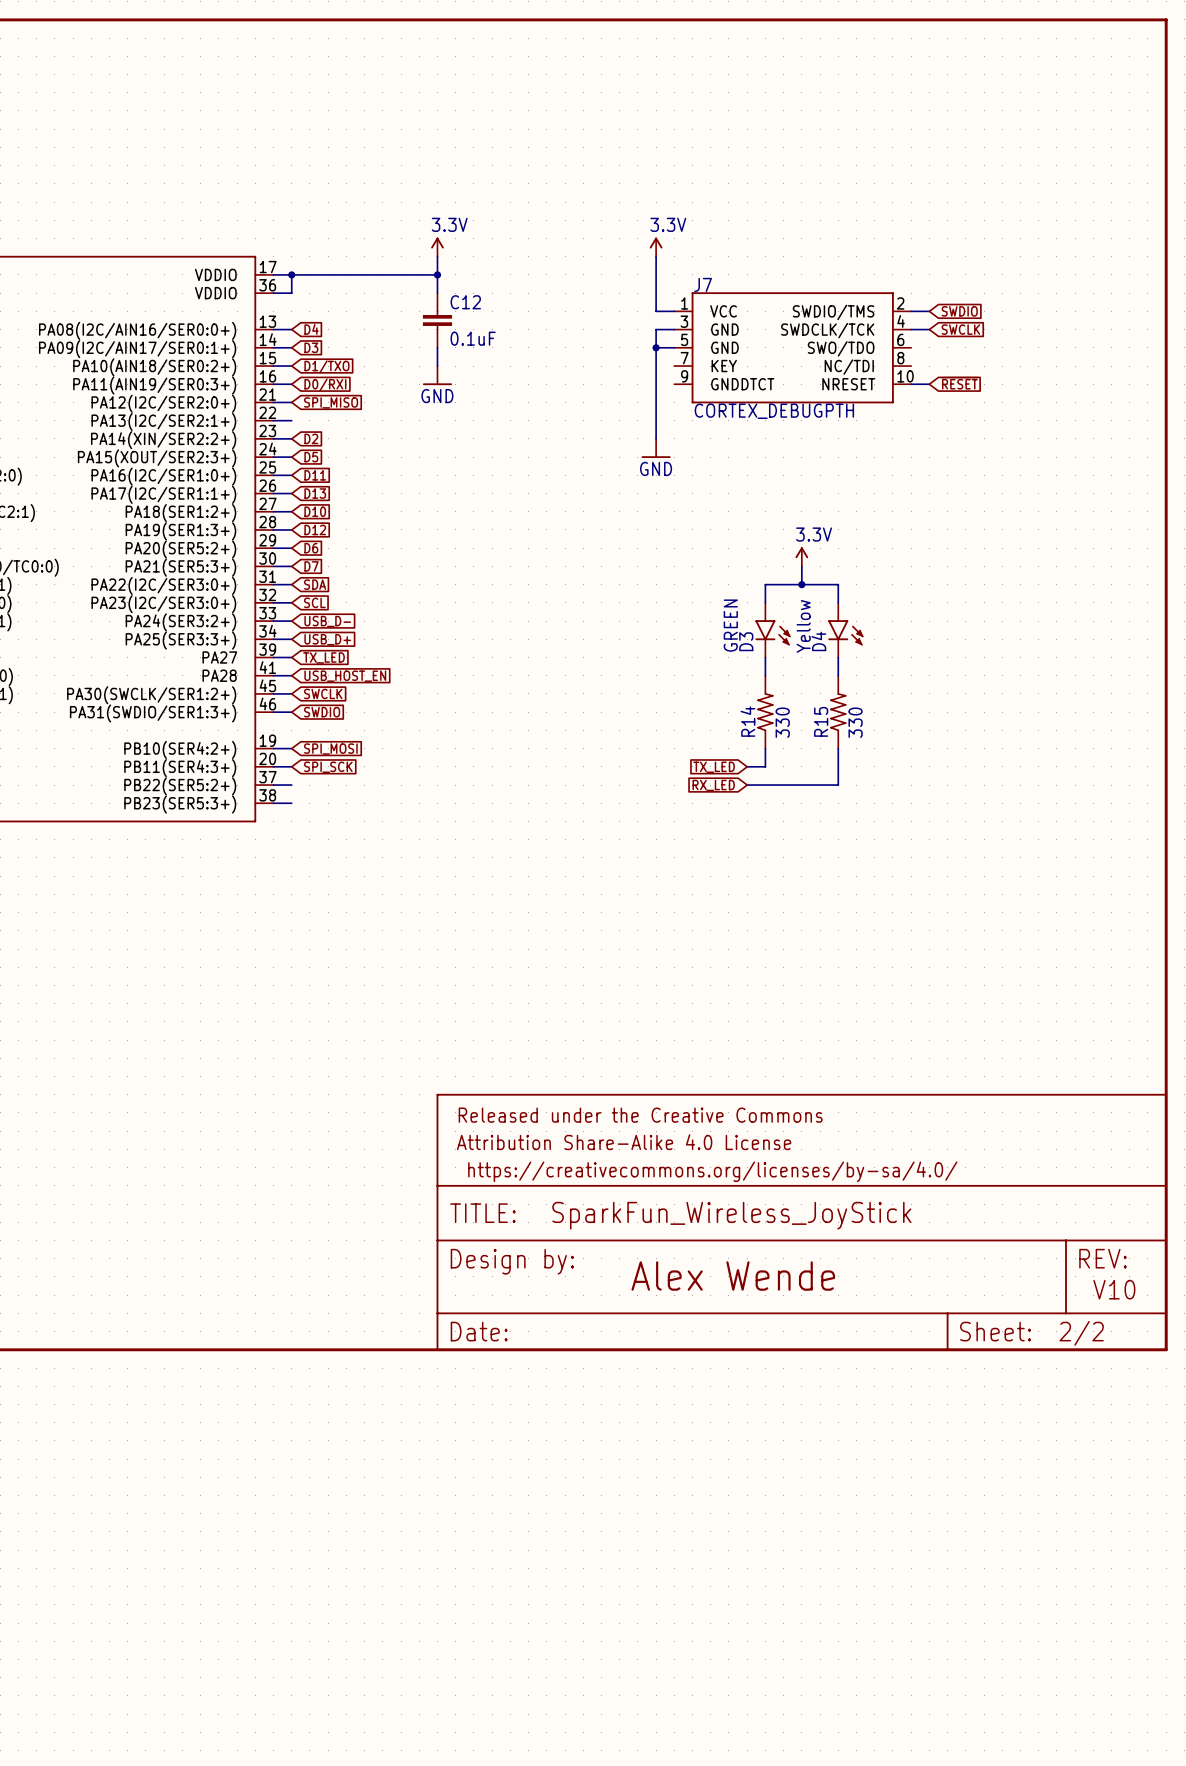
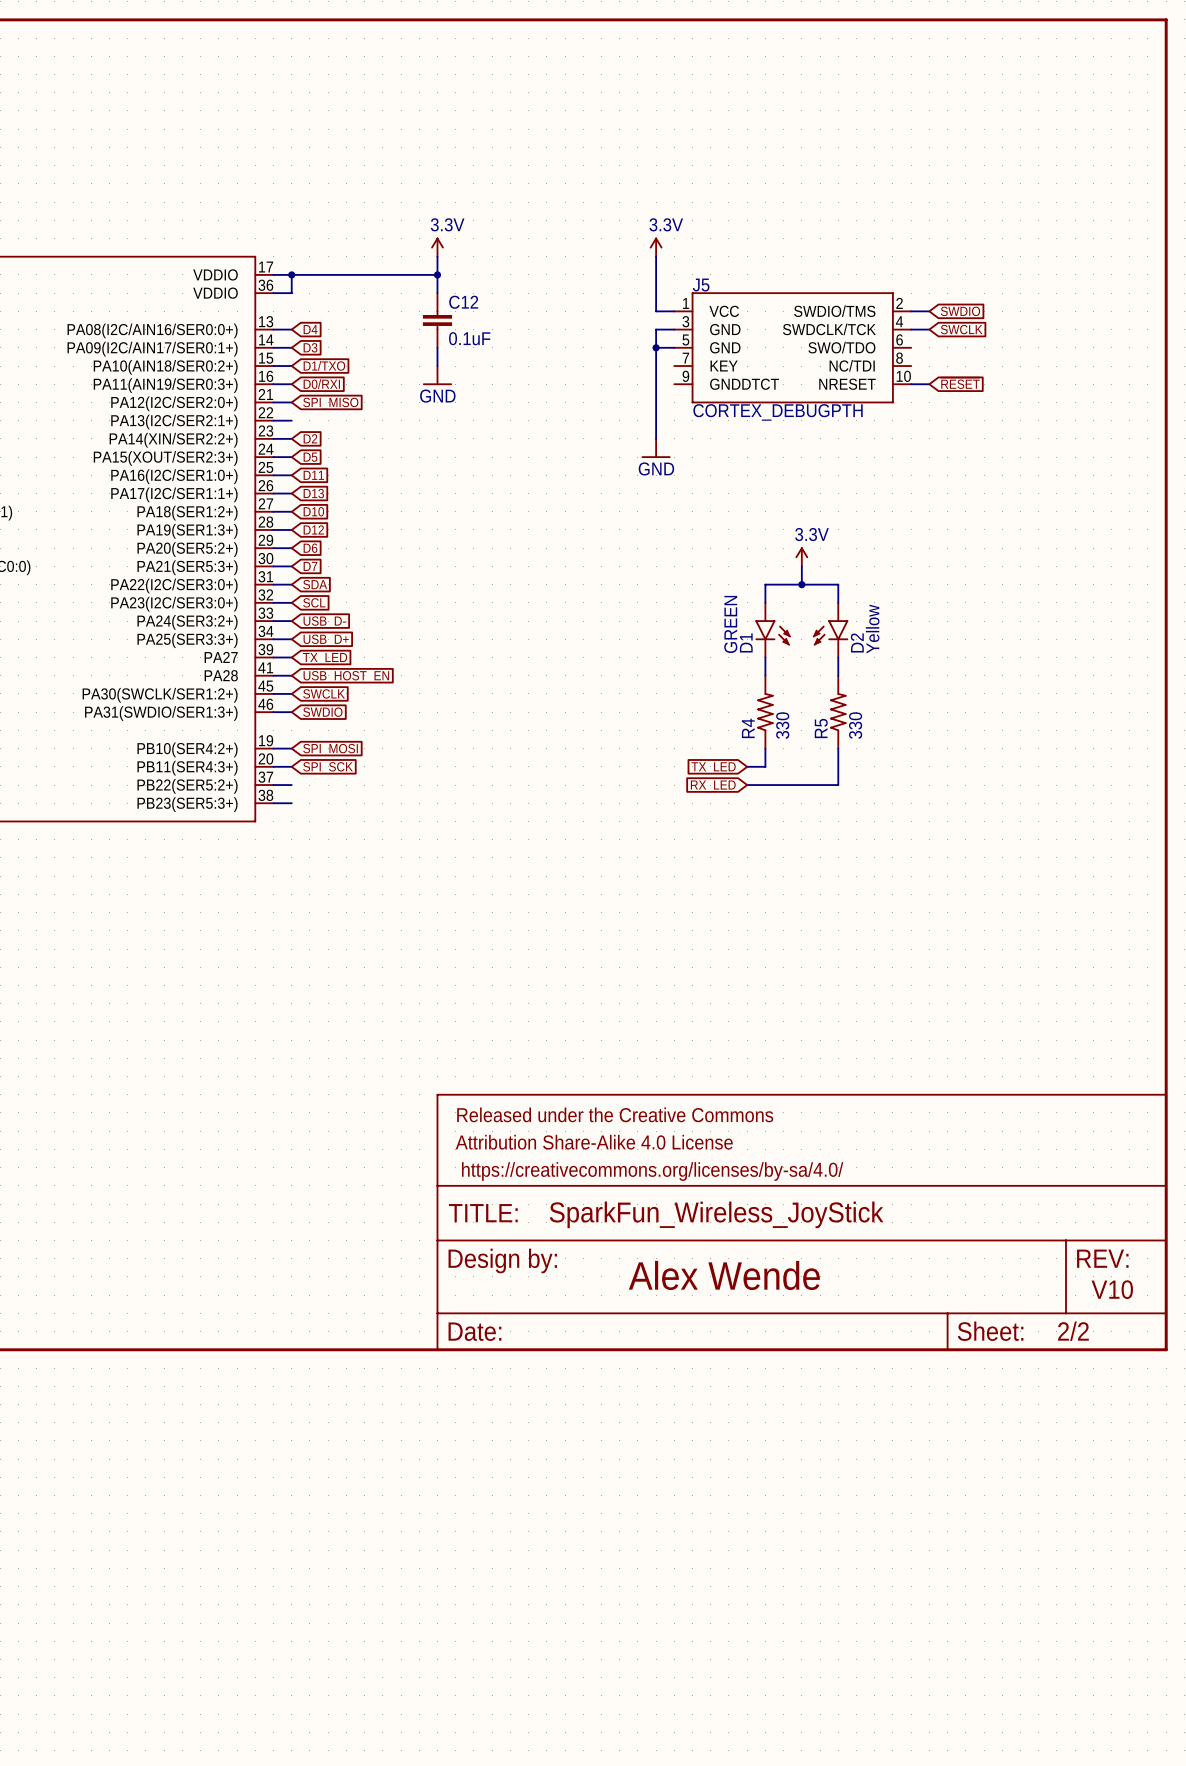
J7 name: J7 (703, 284) -> J5 (701, 285)
D2: none -> Yellow (830, 630)
D4: Yellow (845, 630) -> none
D3 name: D3 (746, 641) -> D1 (746, 642)
R14 name: R14 (747, 721) -> R4 (748, 728)
R15 name: R15 (821, 721) -> R5 (821, 728)

